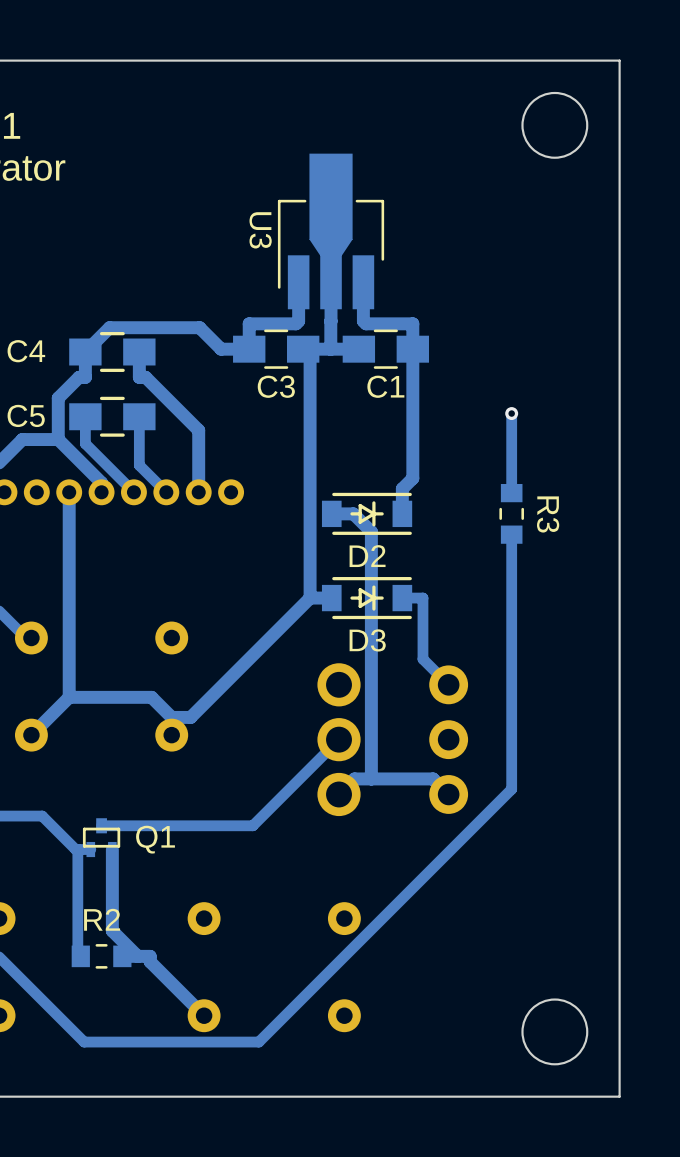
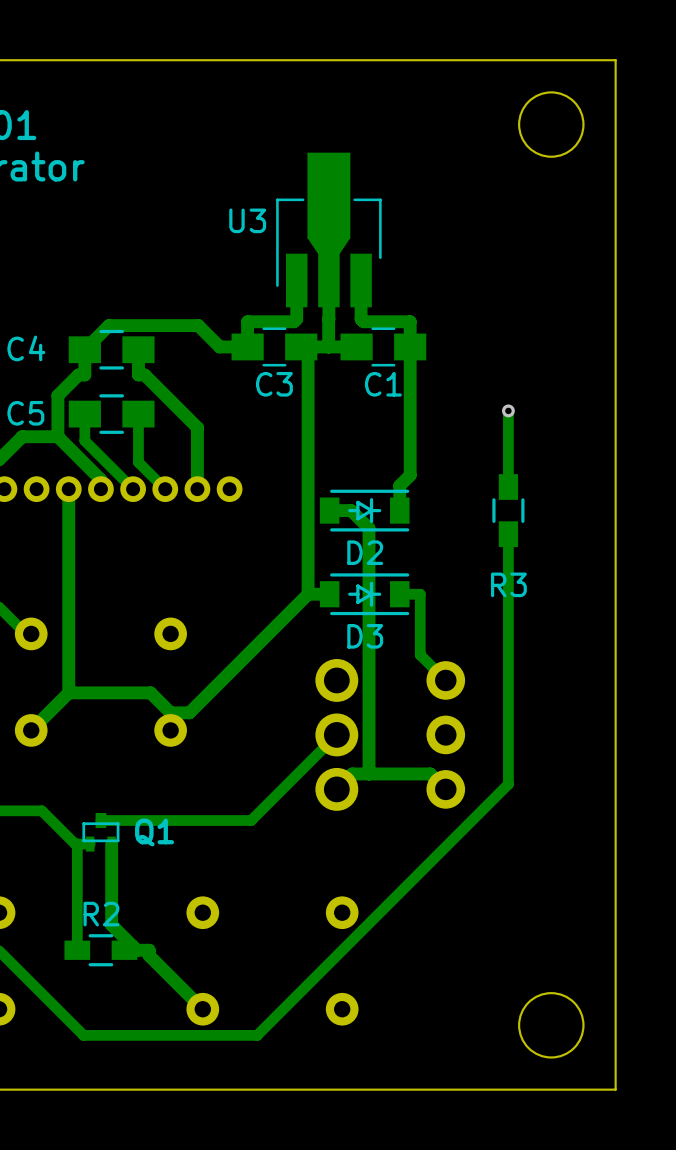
U3 name rotation: 0° (260, 230) -> 90° counterclockwise (247, 220)
R3 footprint: [499, 483, 524, 544] -> [492, 474, 525, 548]
R3 name rotation: 0° (548, 514) -> 90° counterclockwise (508, 584)
R3 name position: R3 (548, 514) -> R3 (508, 584)
R2 footprint: [71, 944, 132, 969] -> [64, 934, 138, 967]

